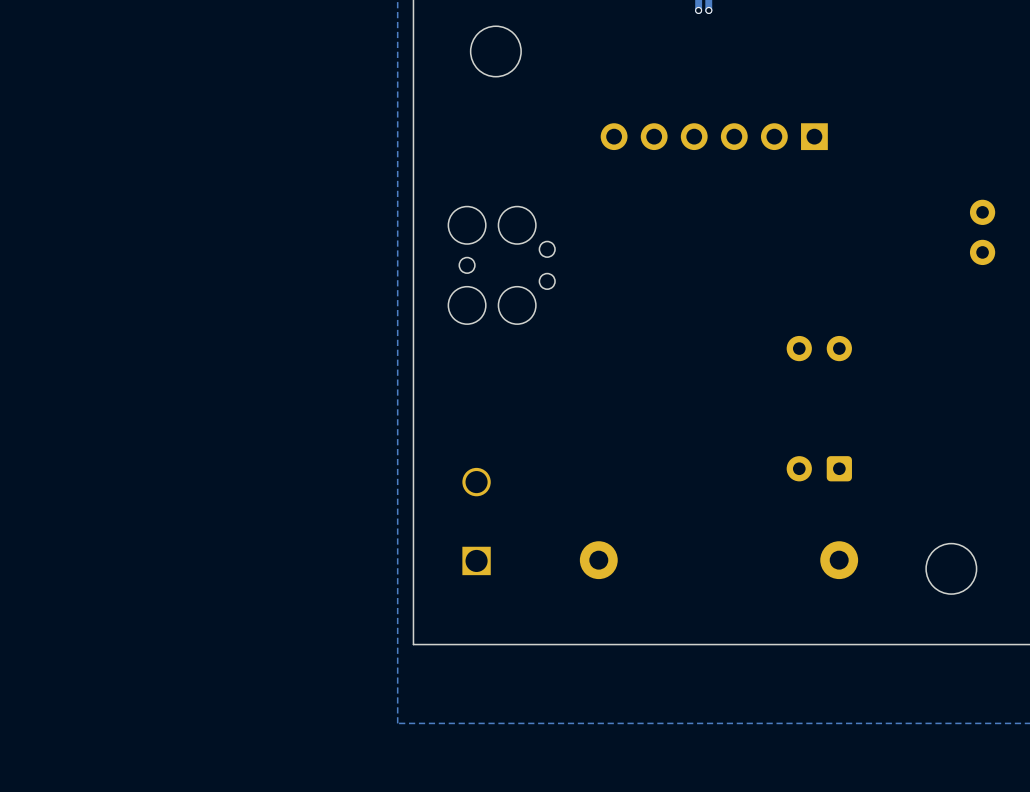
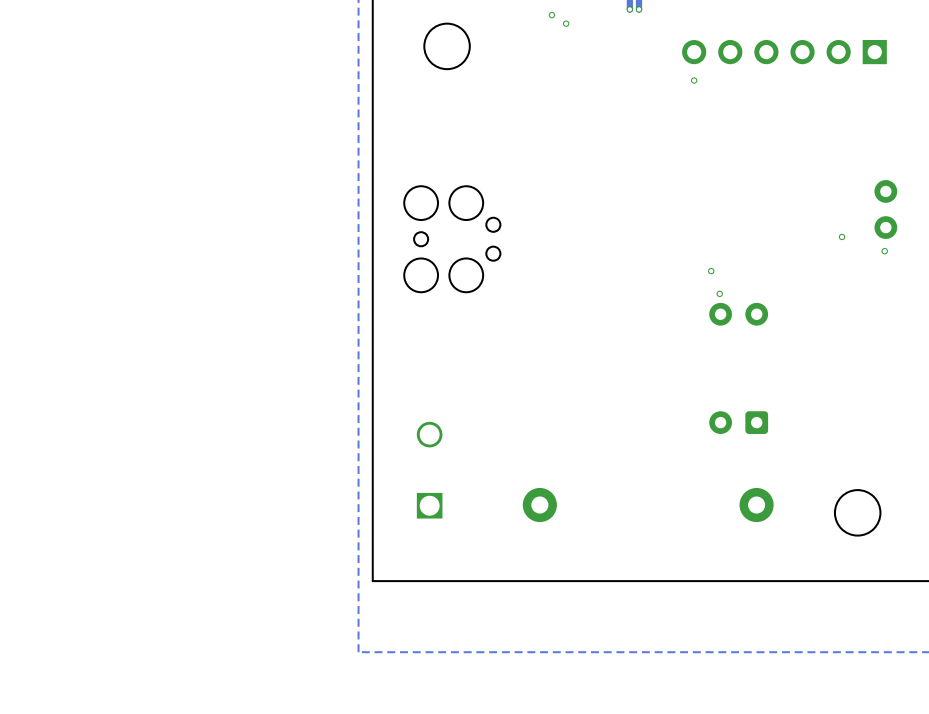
via: none -> (551, 15)
via: none -> (566, 23)
via: none -> (694, 80)
part position: (714, 136) -> (784, 52)
via: none -> (842, 236)
via: none -> (884, 251)
via: none -> (711, 271)
via: none -> (719, 293)

